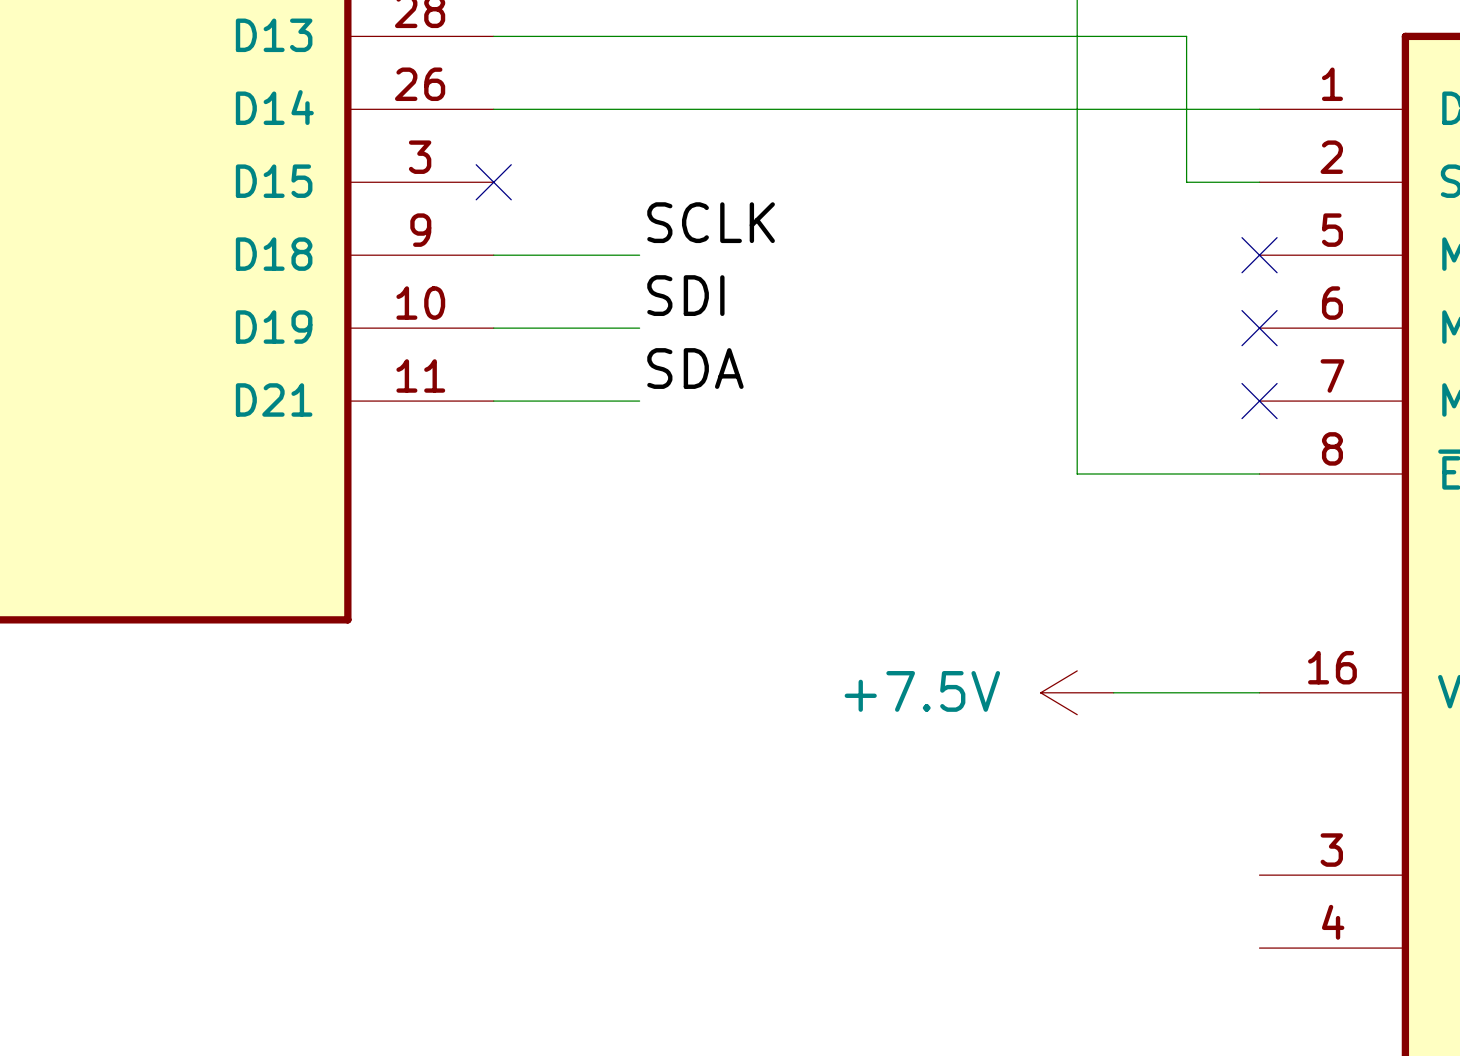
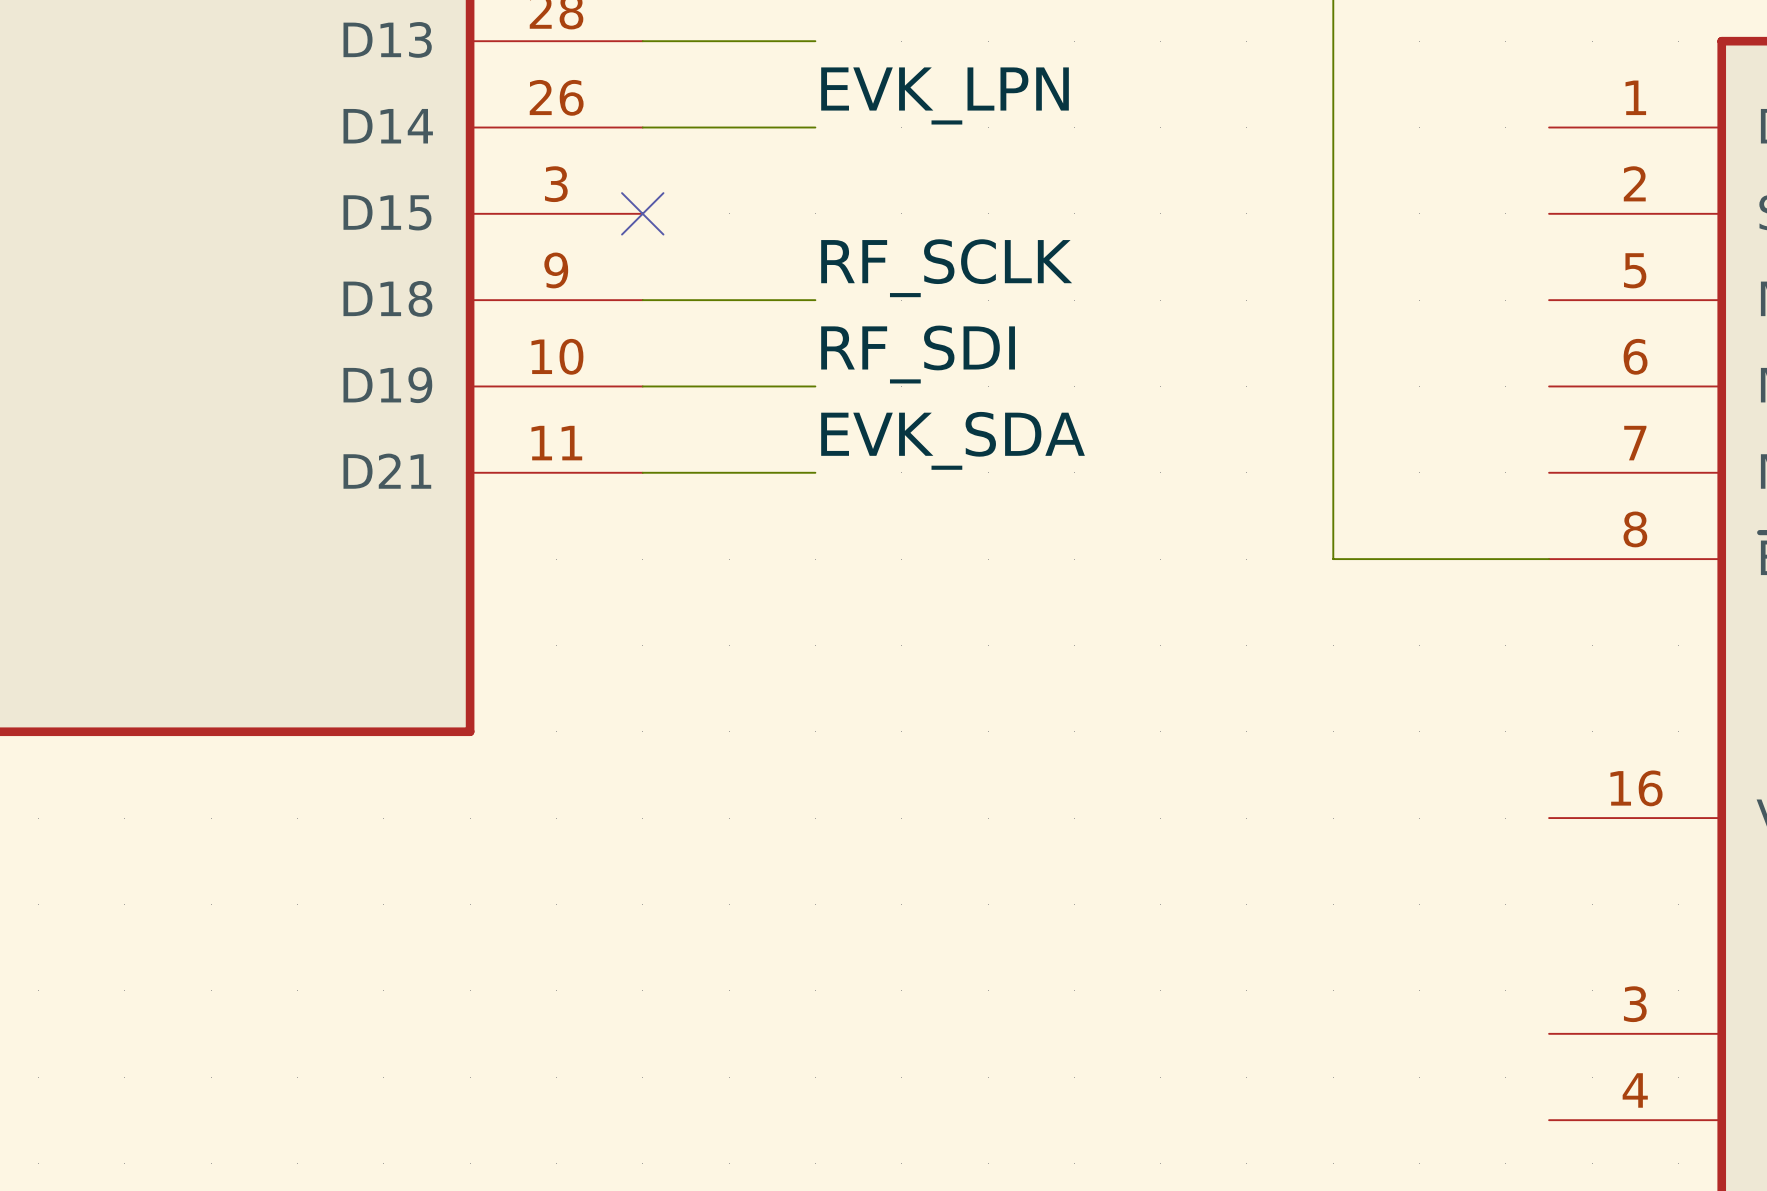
wire: (639, 36) (1186, 36) (1186, 182) (1259, 182) -> none
label: none -> EVK_LPN (945, 95)
wire: (639, 109) (1259, 109) -> none
label: SCLK (711, 222) -> RF_SCLK (946, 268)
no-connect mark: (1259, 255) -> none
label: SDI (685, 295) -> RF_SDI (918, 354)
no-connect mark: (1259, 328) -> none
label: SDA (695, 368) -> EVK_SDA (953, 440)
no-connect mark: (1259, 401) -> none
power symbol: +7.5V (1077, 692) -> none
wire: (1113, 692) (1259, 692) -> none

